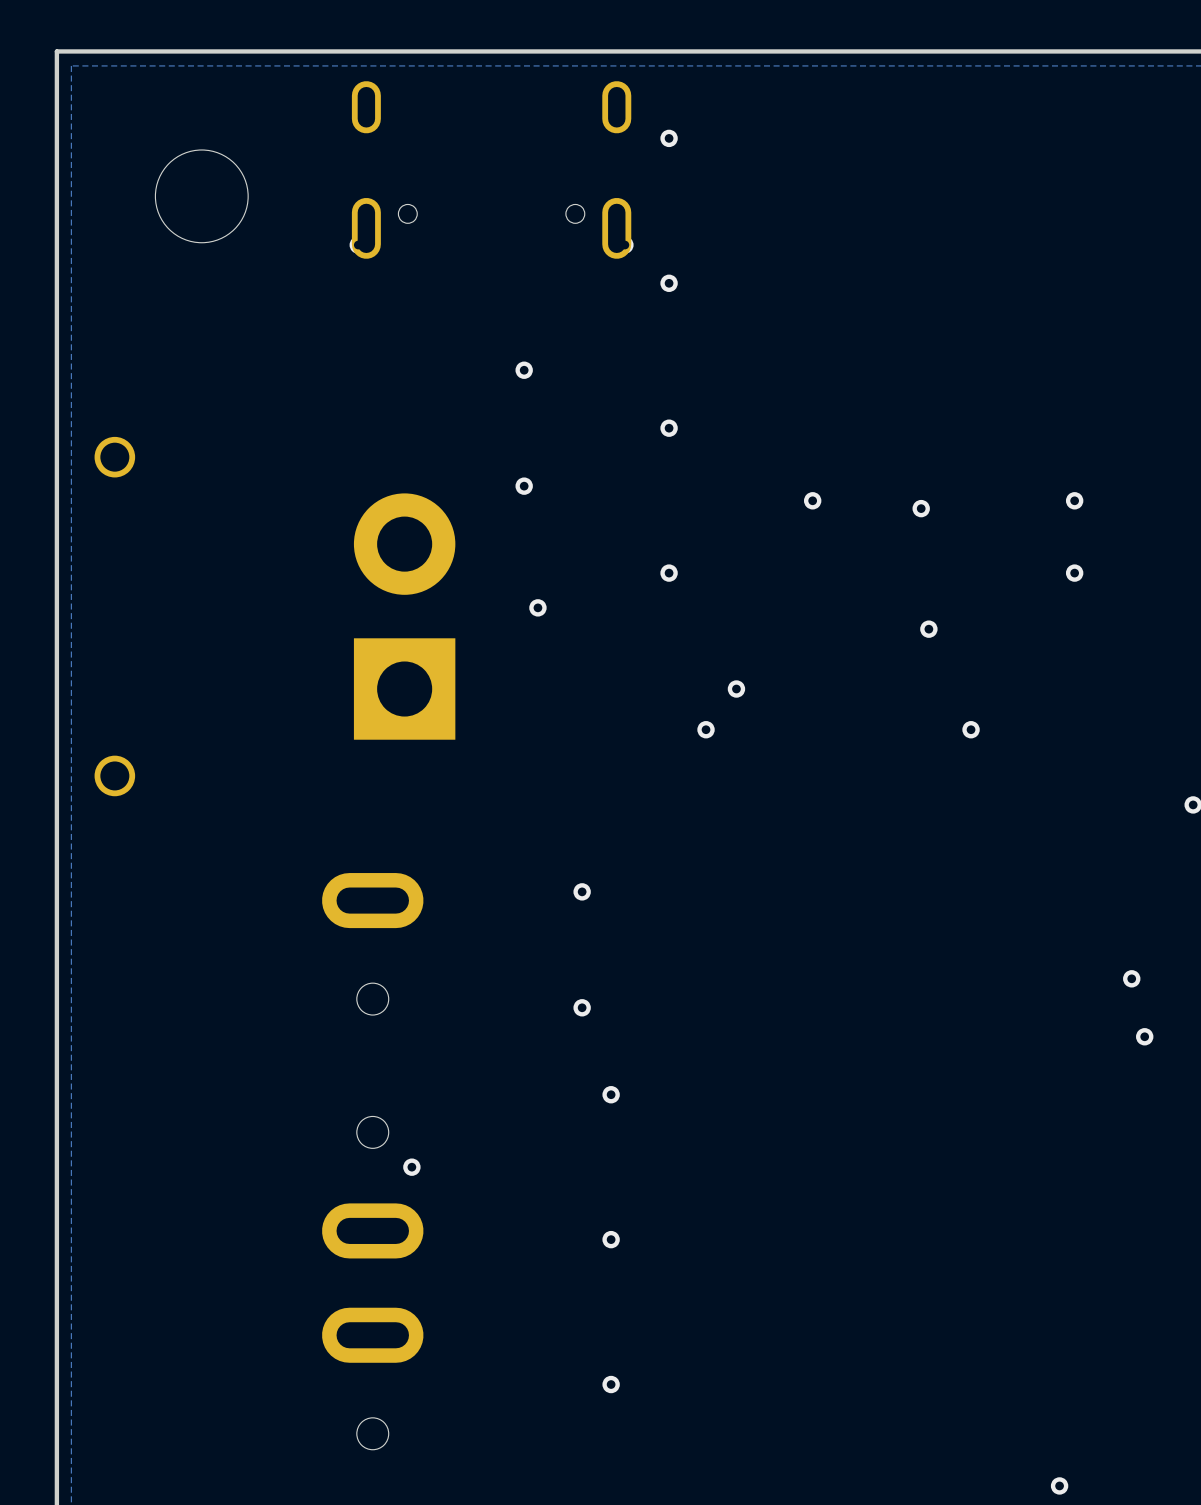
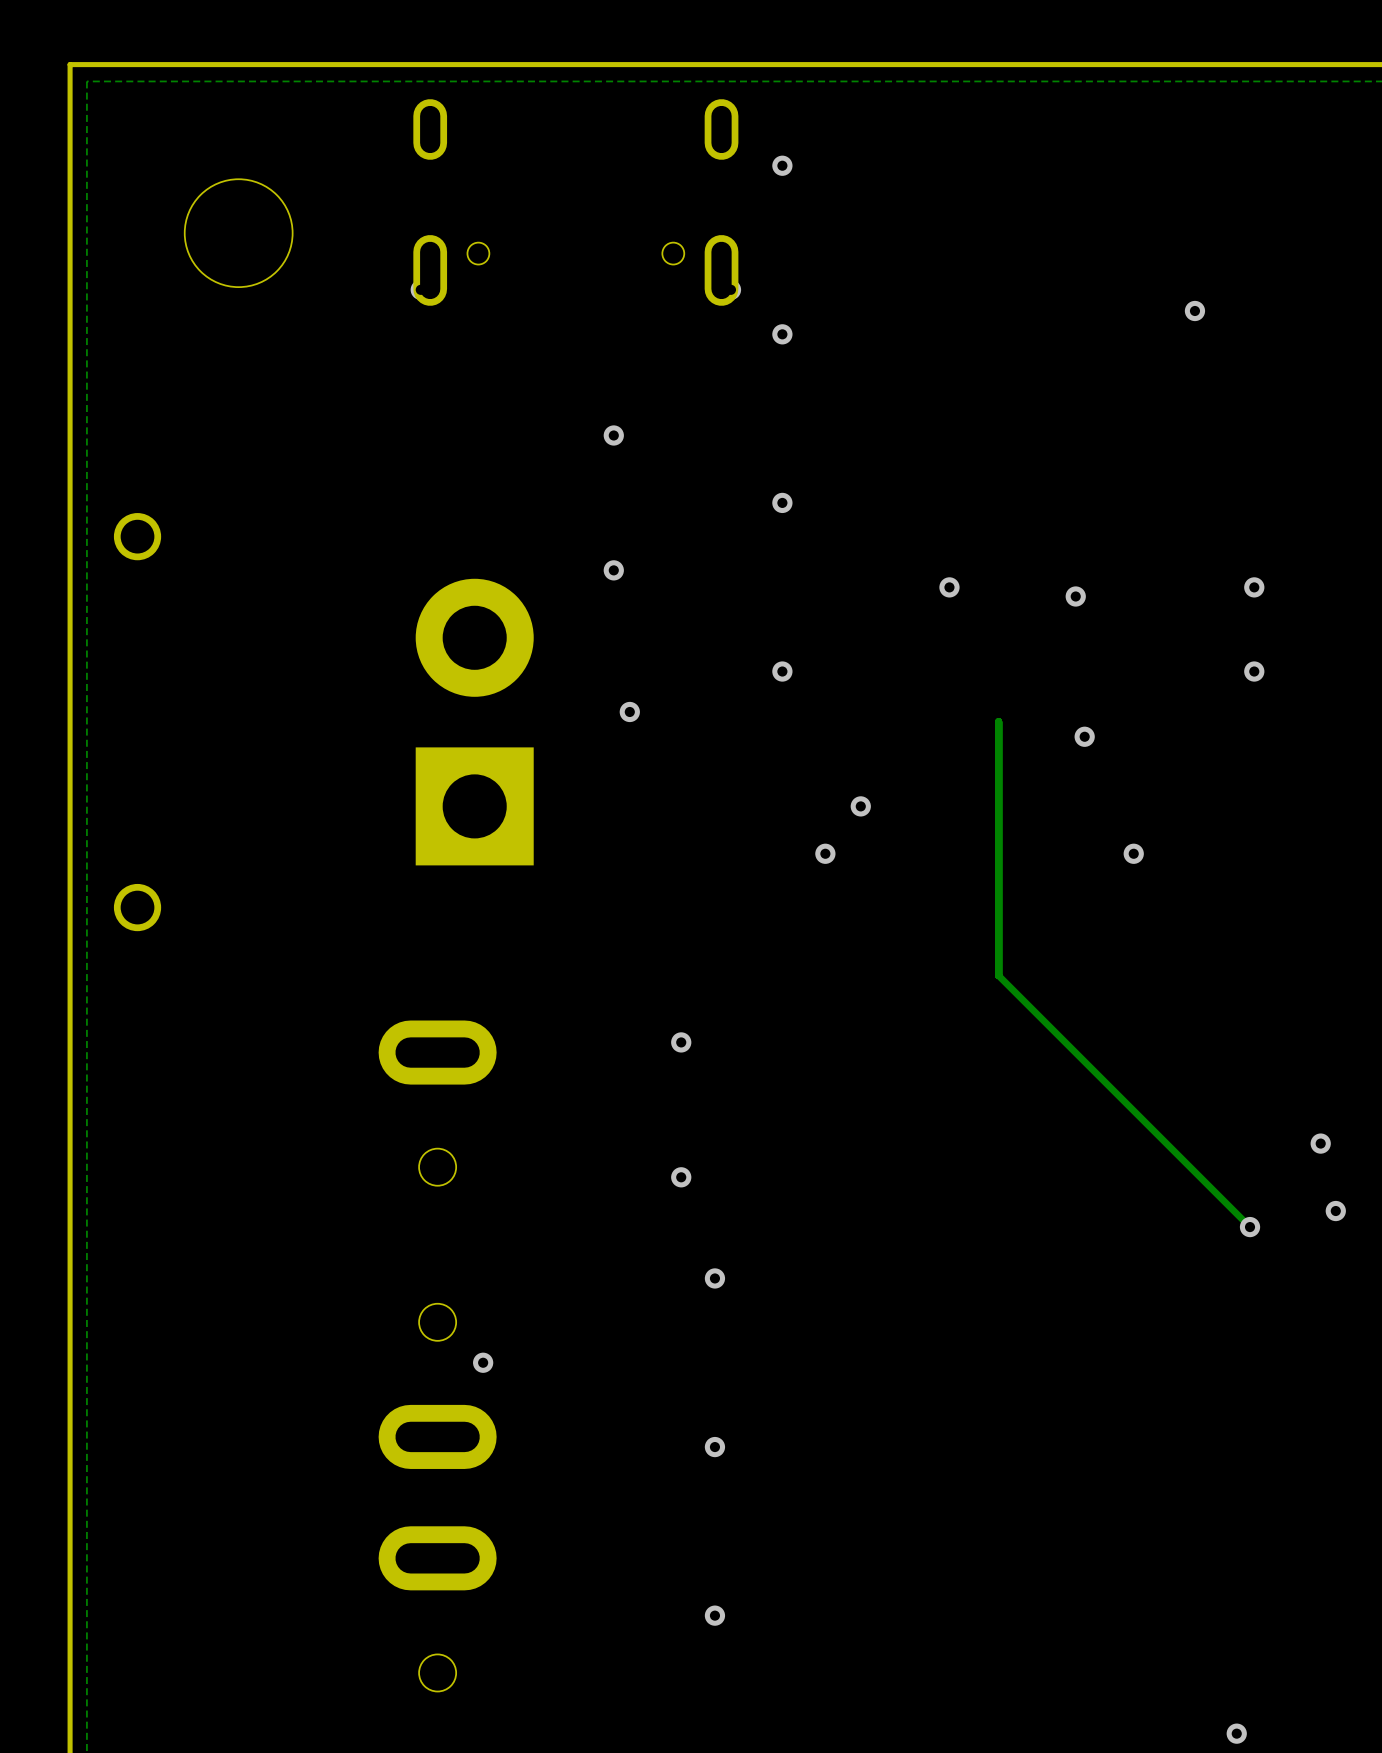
via: none -> (1194, 310)
track: none -> (998, 721) (998, 975) (1250, 1227)
via: none -> (1250, 1227)

